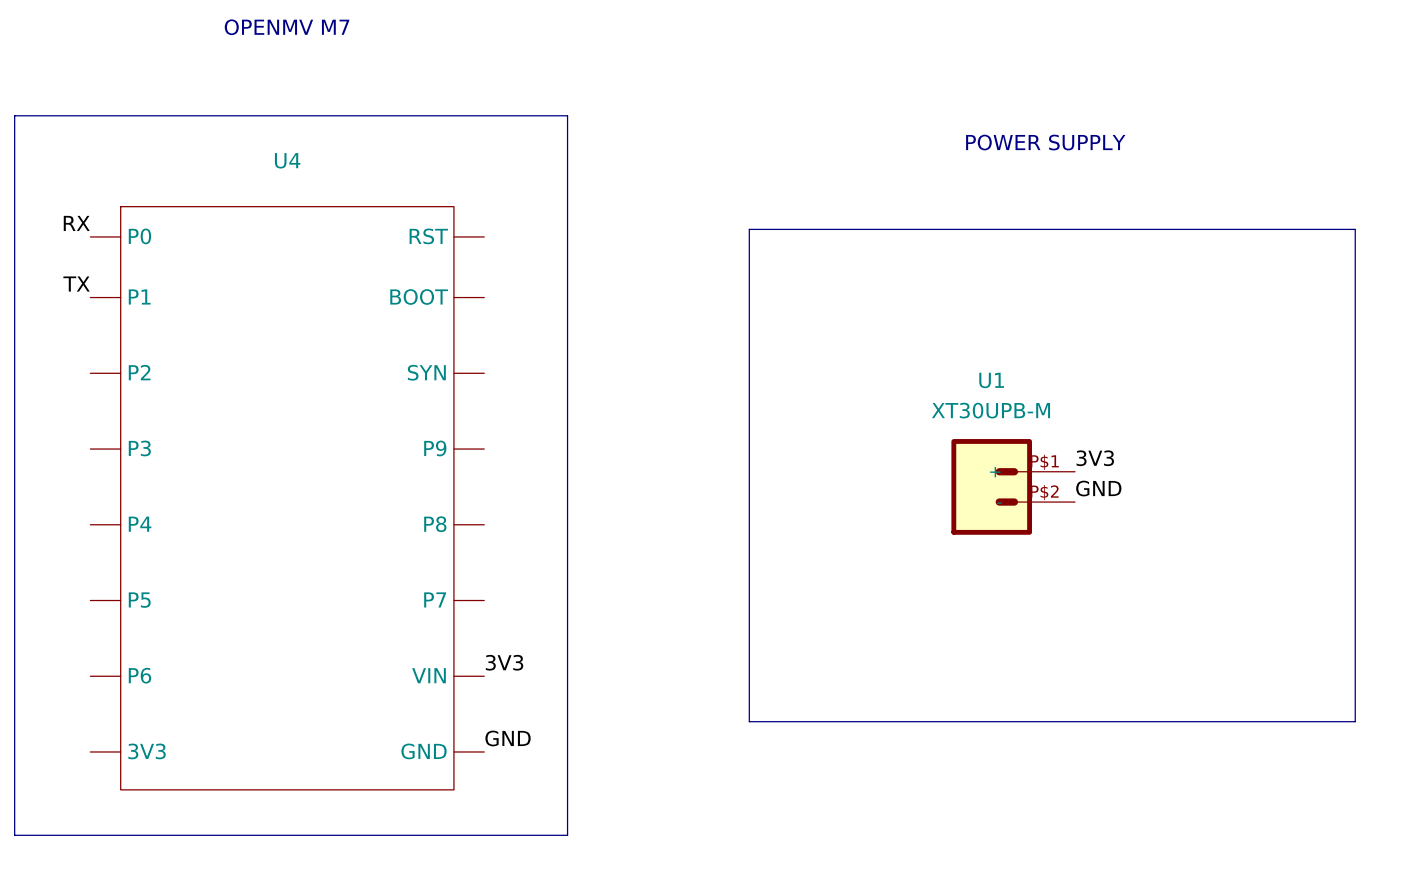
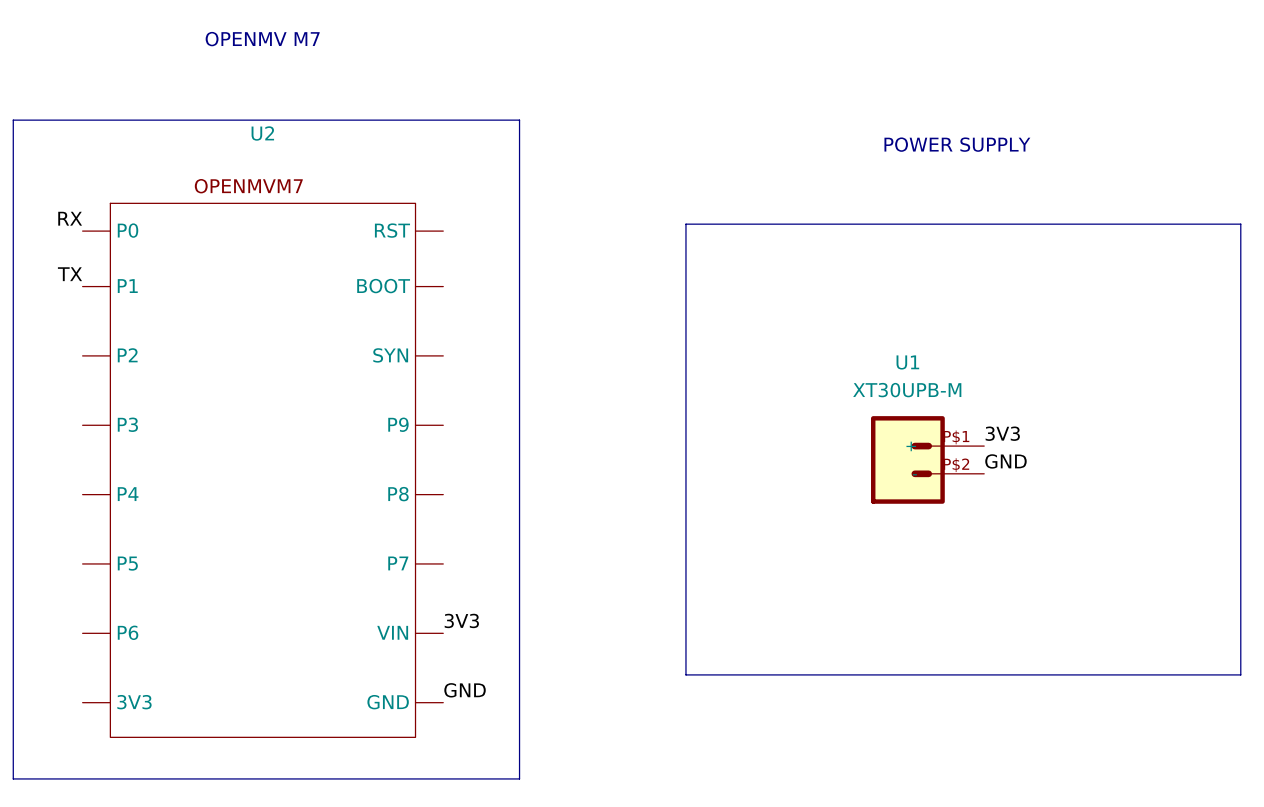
U4 name: U4 (287, 160) -> U2 (262, 133)
U4 text: none -> OPENMVM7 (248, 186)

